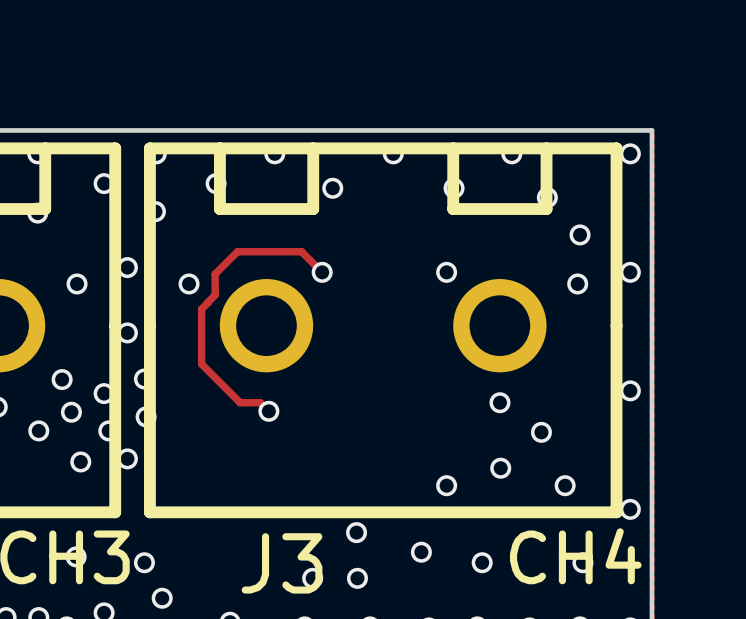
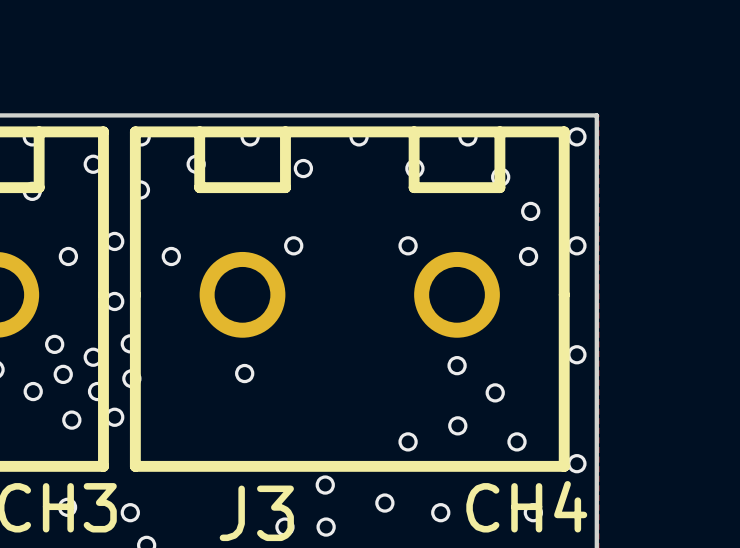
track: (322, 272) (301, 251) (237, 251) (215, 274) (215, 295) (201, 309) (201, 364) (240, 402) (260, 402) (268, 411) -> none

